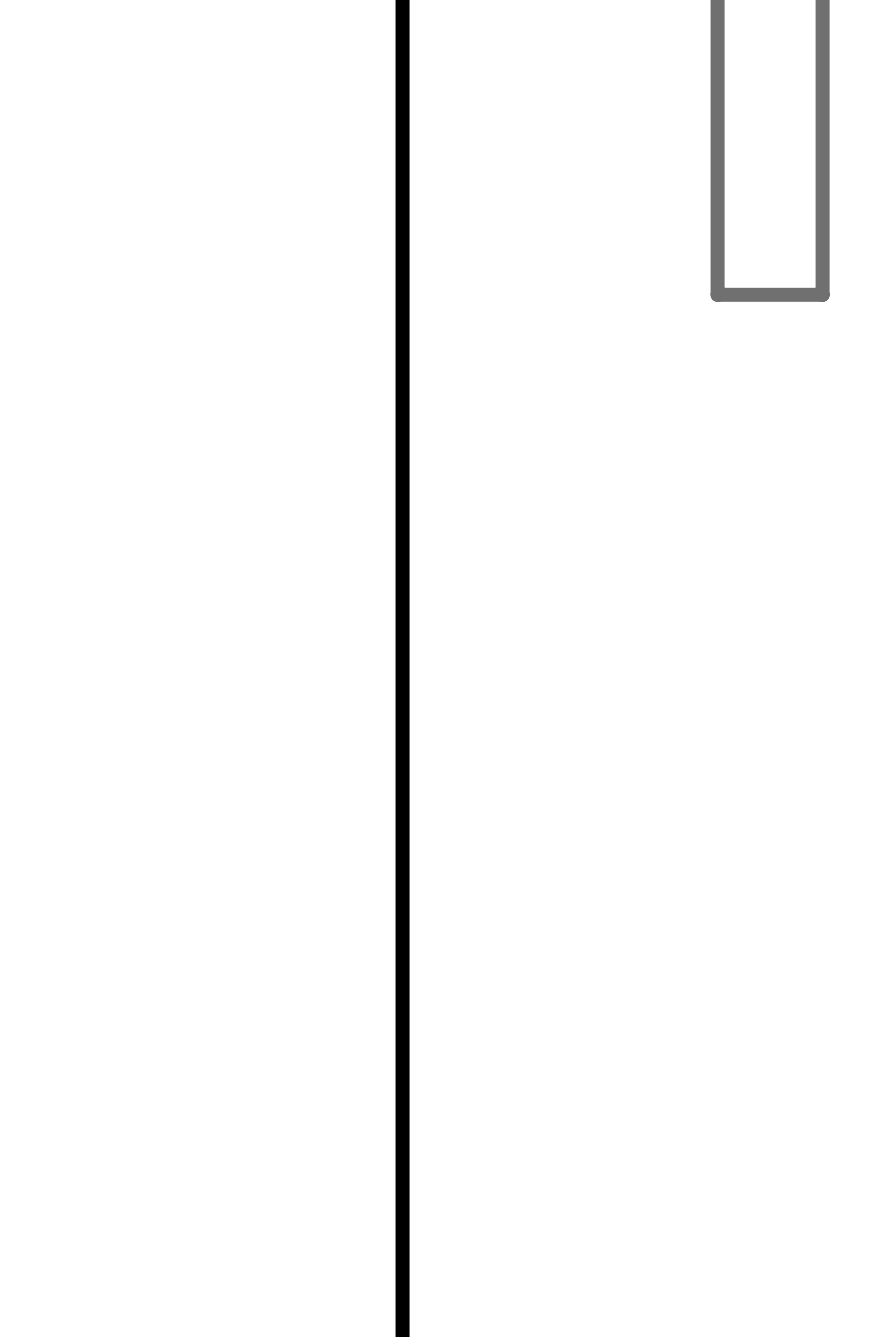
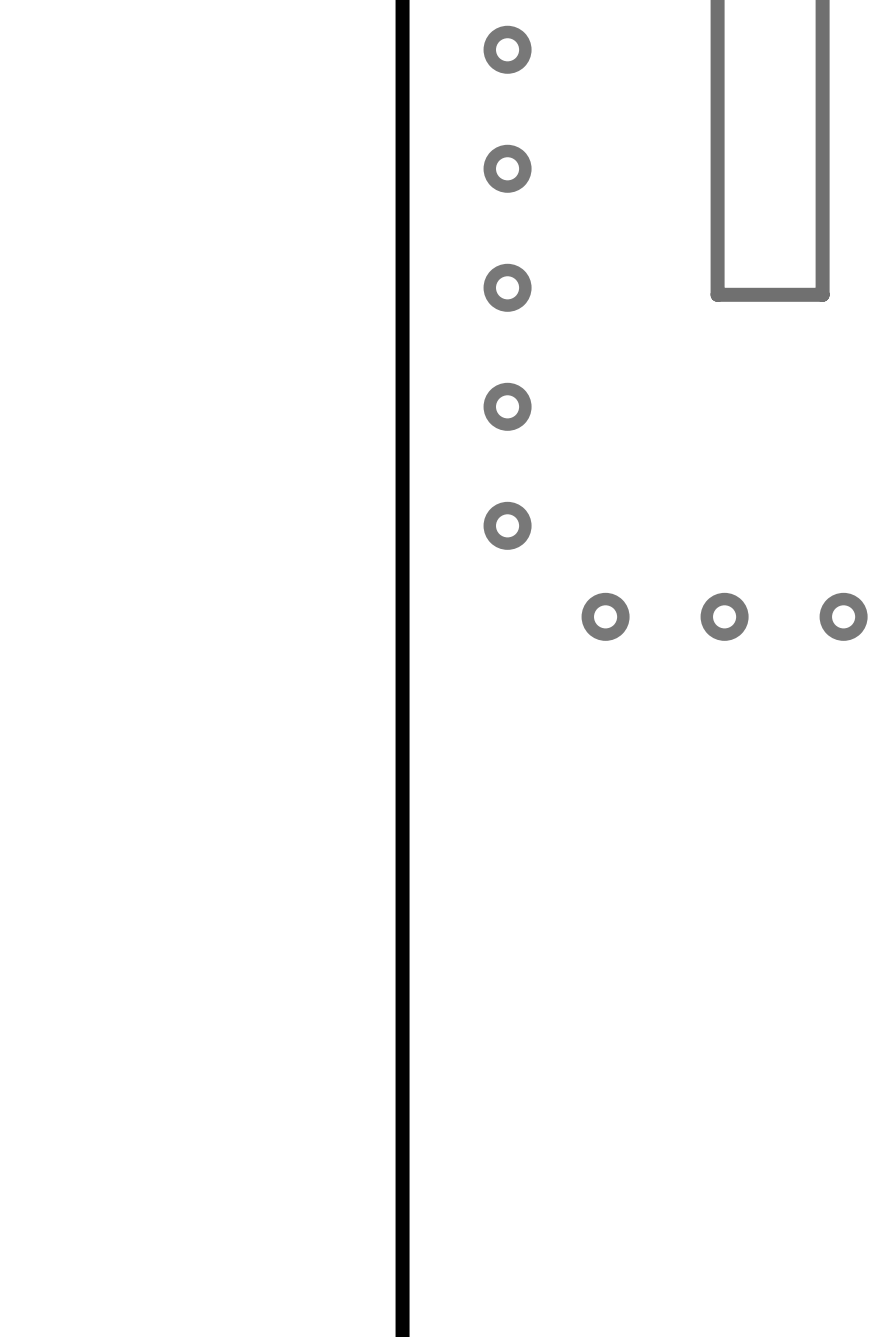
via: none -> (507, 49)
via: none -> (507, 168)
via: none -> (507, 287)
via: none -> (507, 406)
via: none -> (507, 525)
via: none -> (605, 616)
via: none -> (724, 616)
via: none -> (843, 616)

